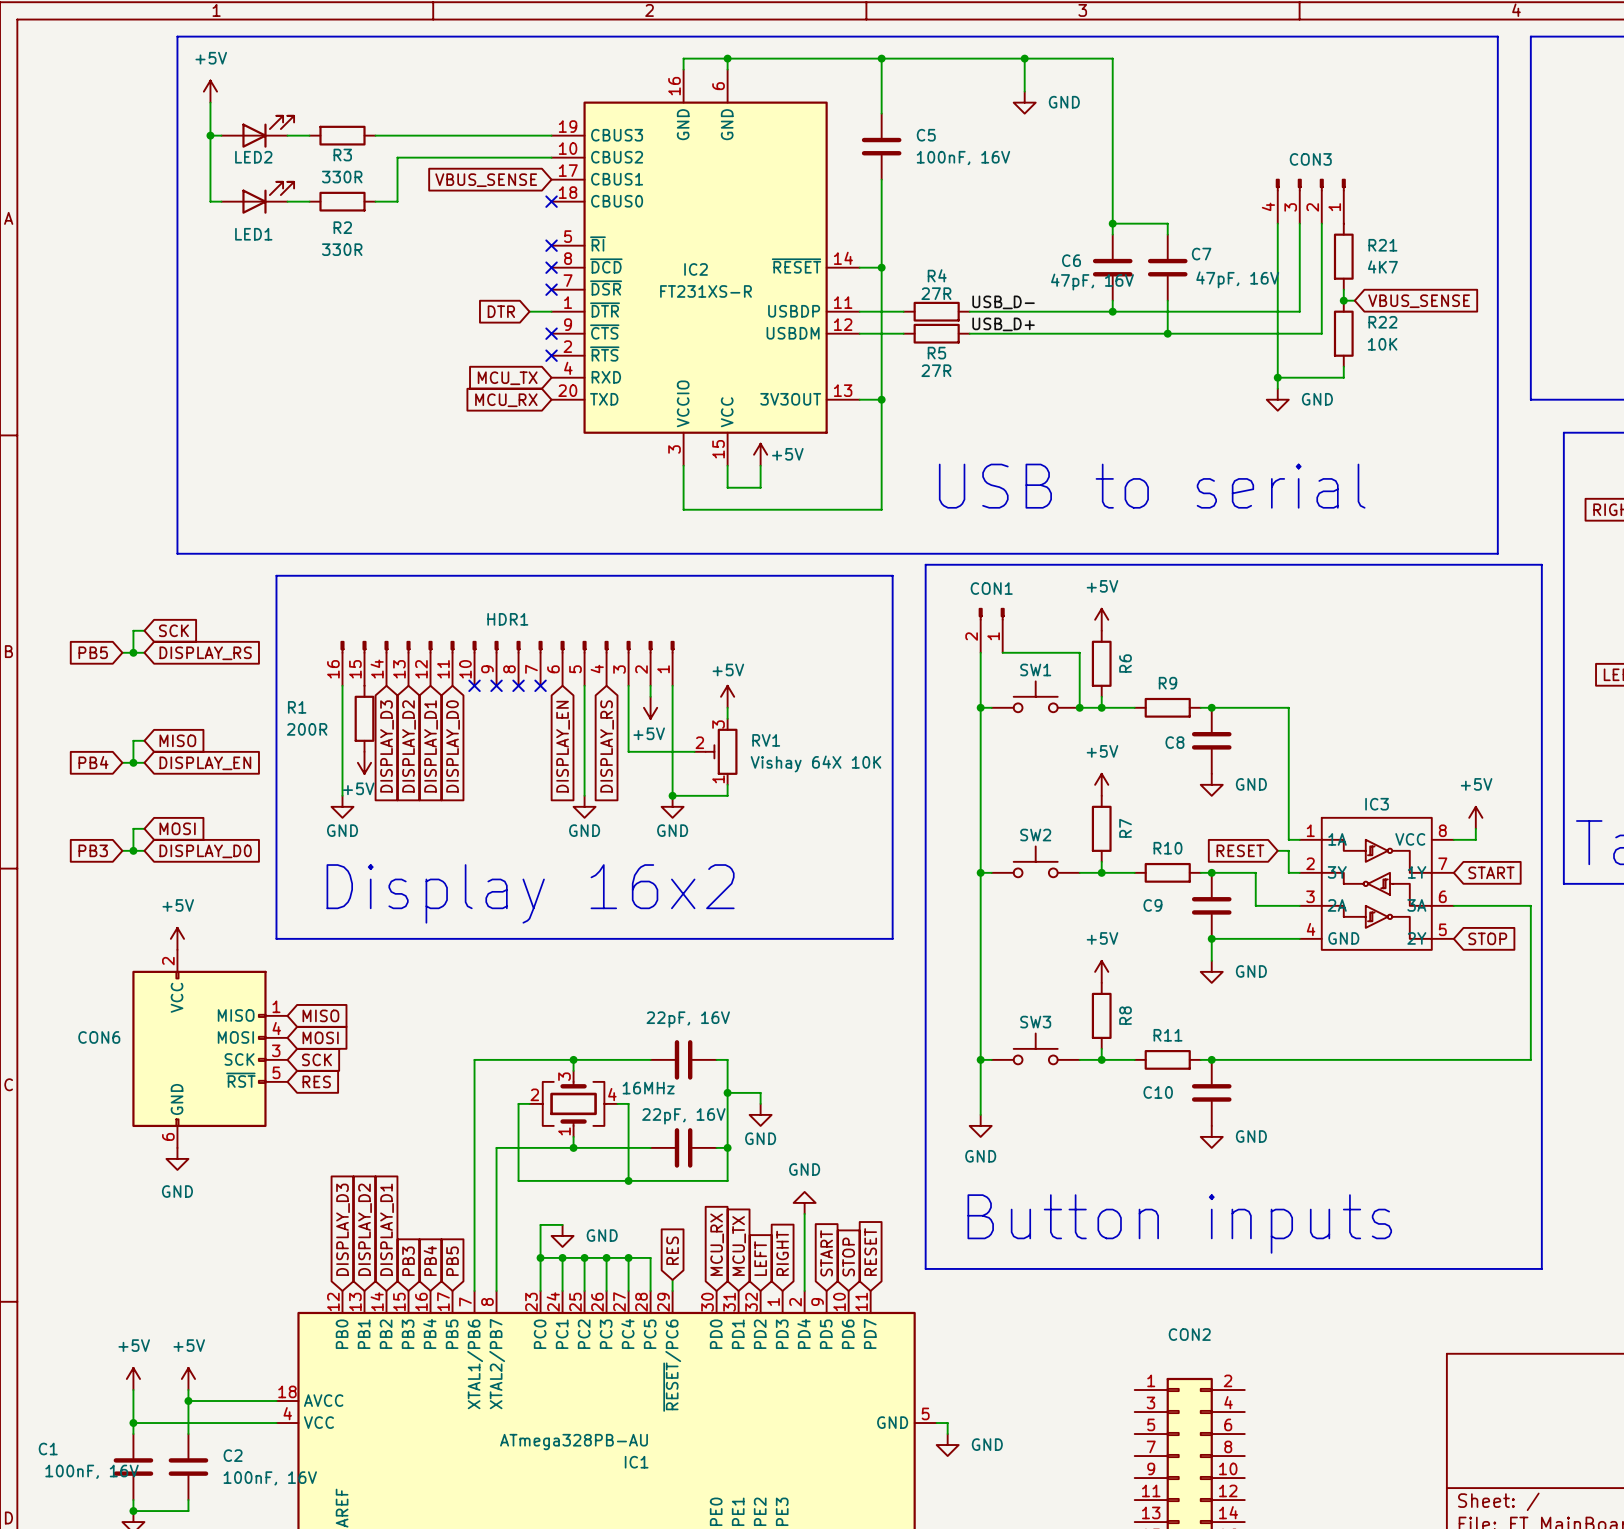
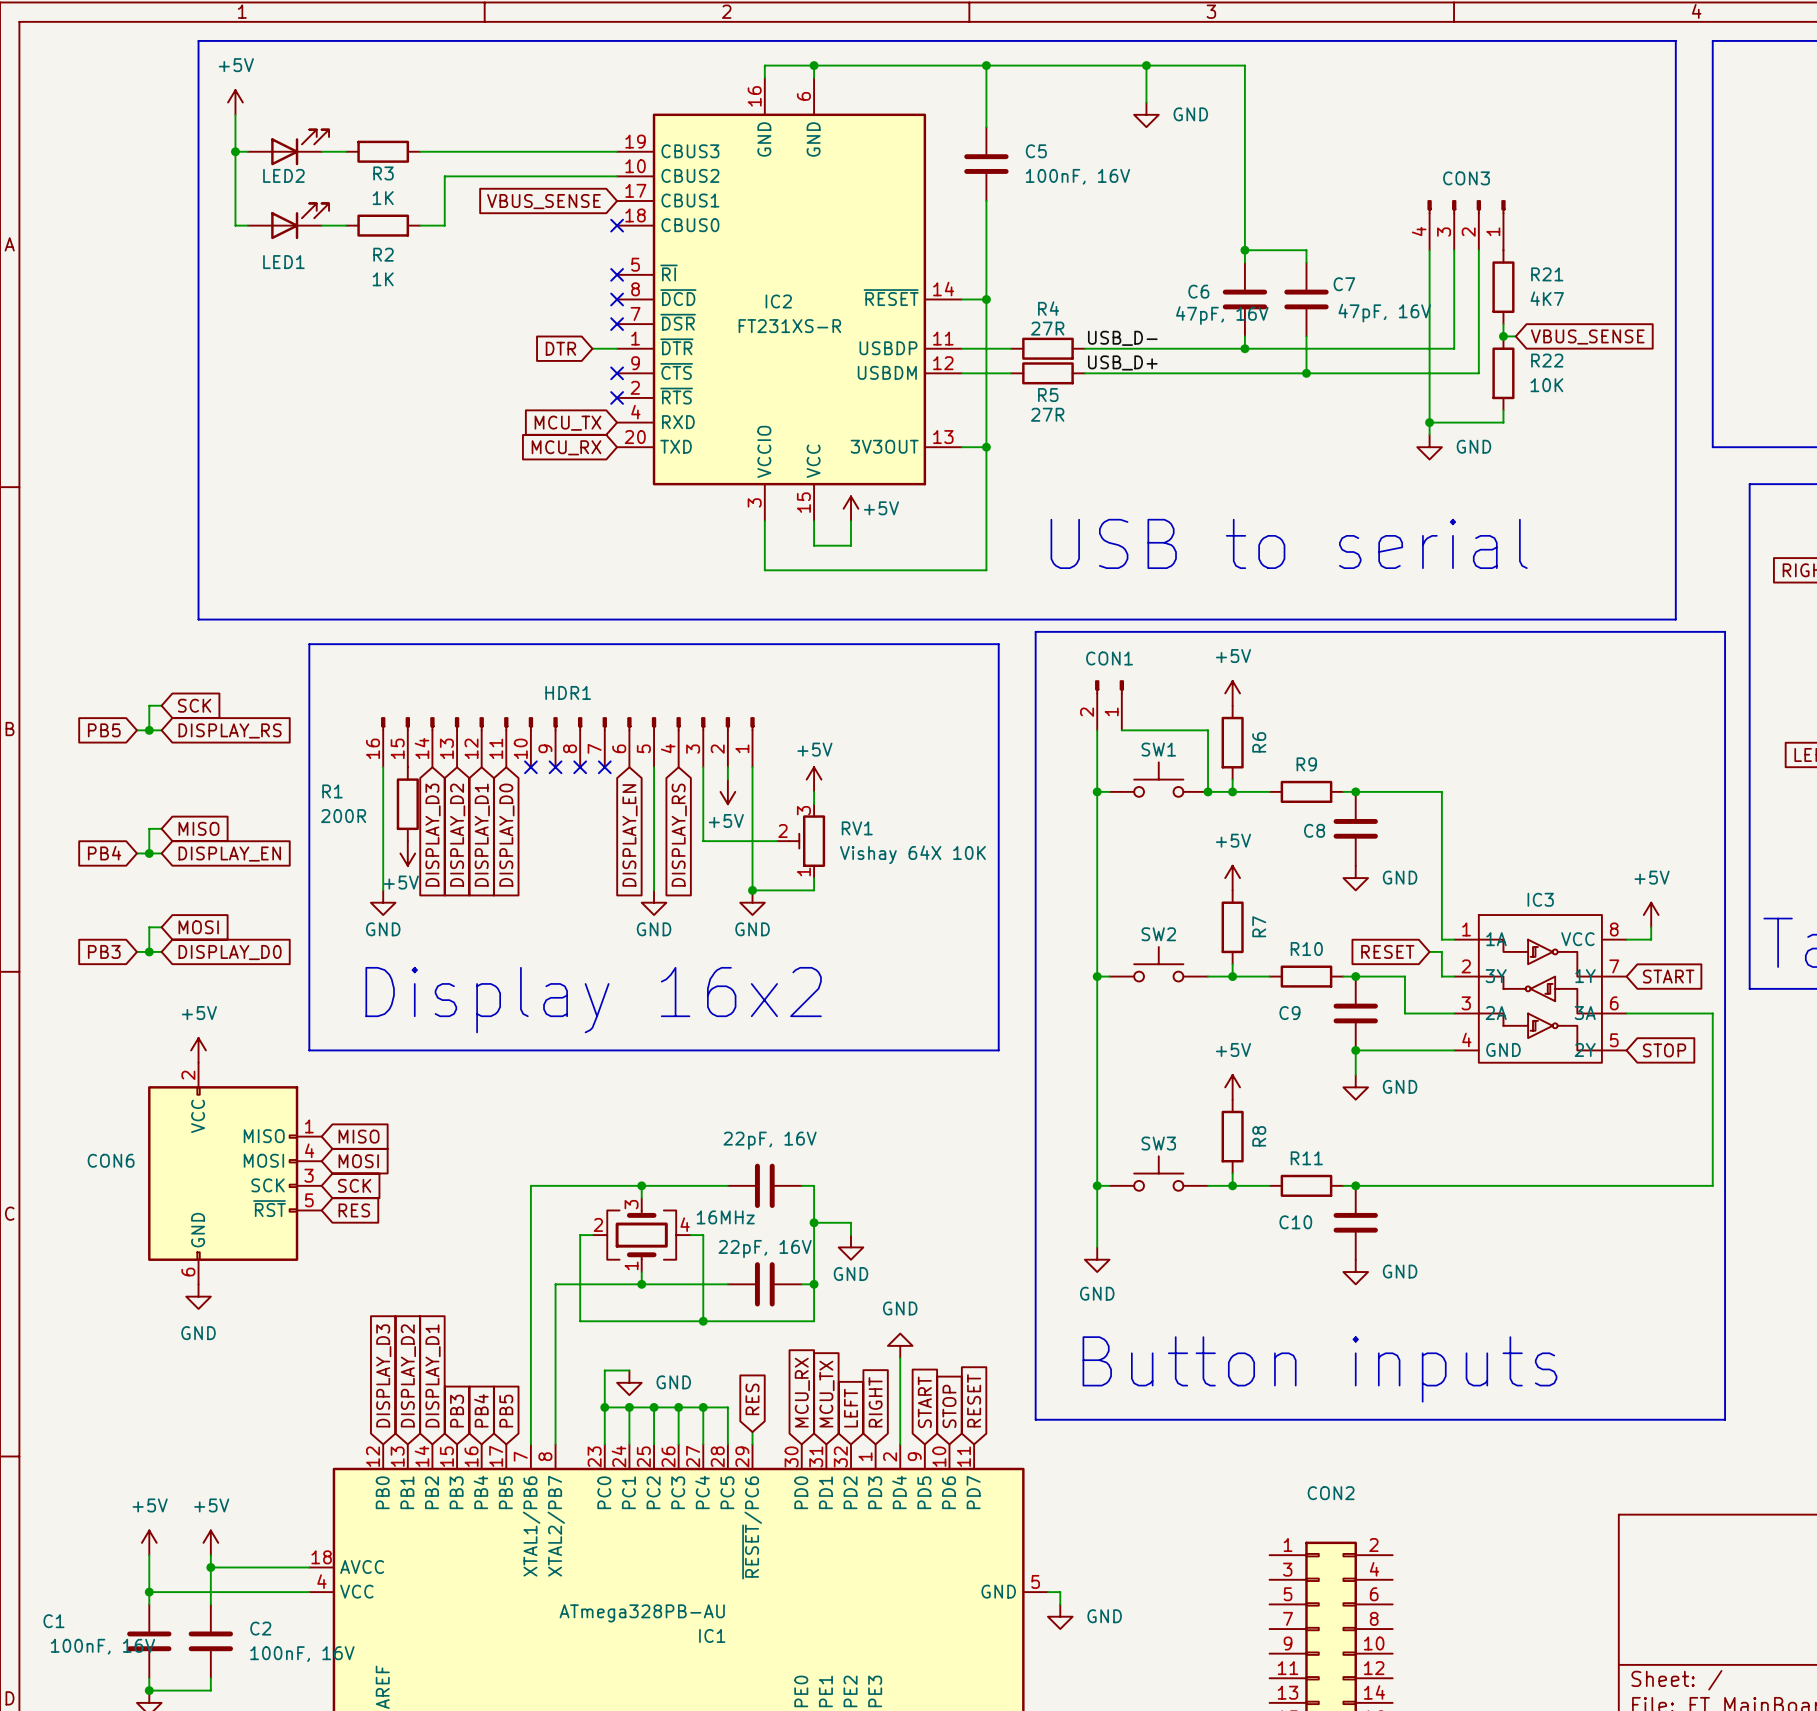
R3 value: 330R (342, 177) -> 1K (383, 198)
R2 value: 330R (342, 249) -> 1K (383, 279)

